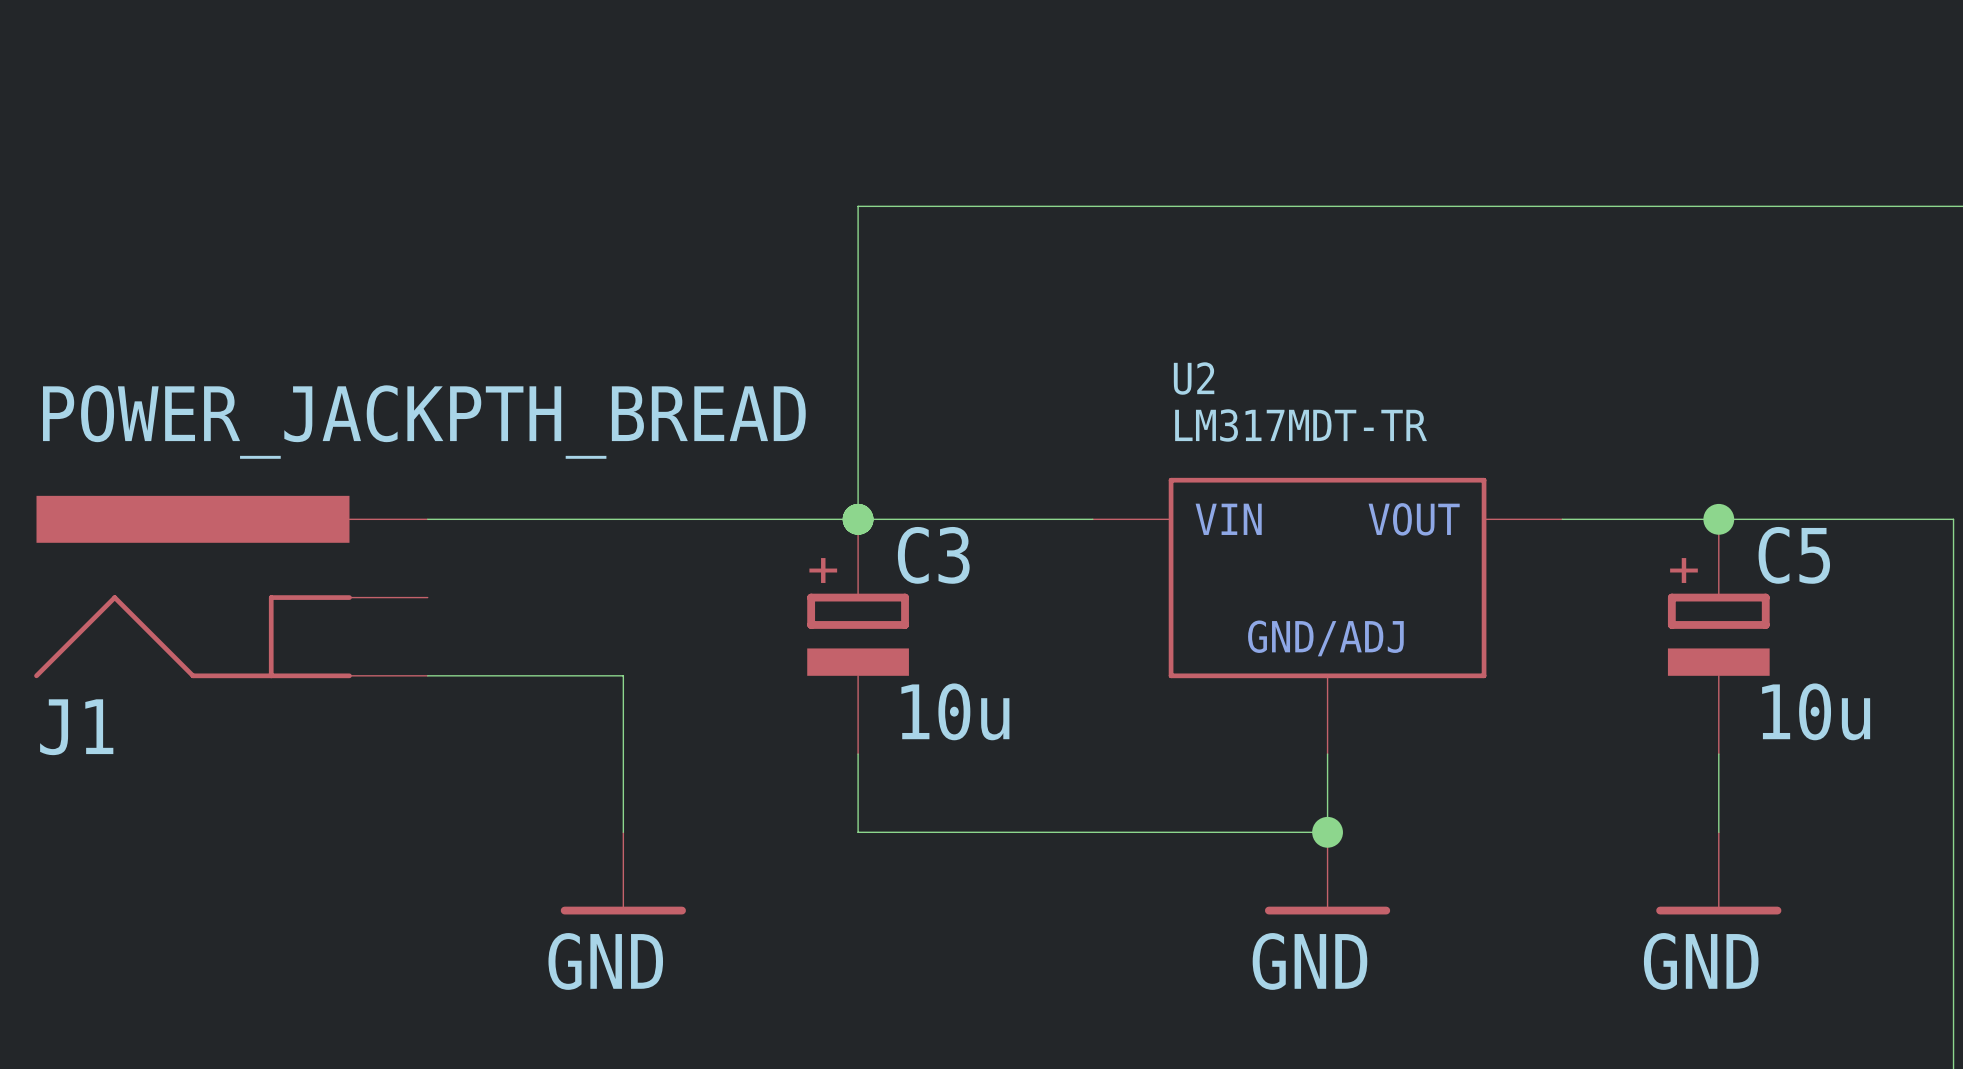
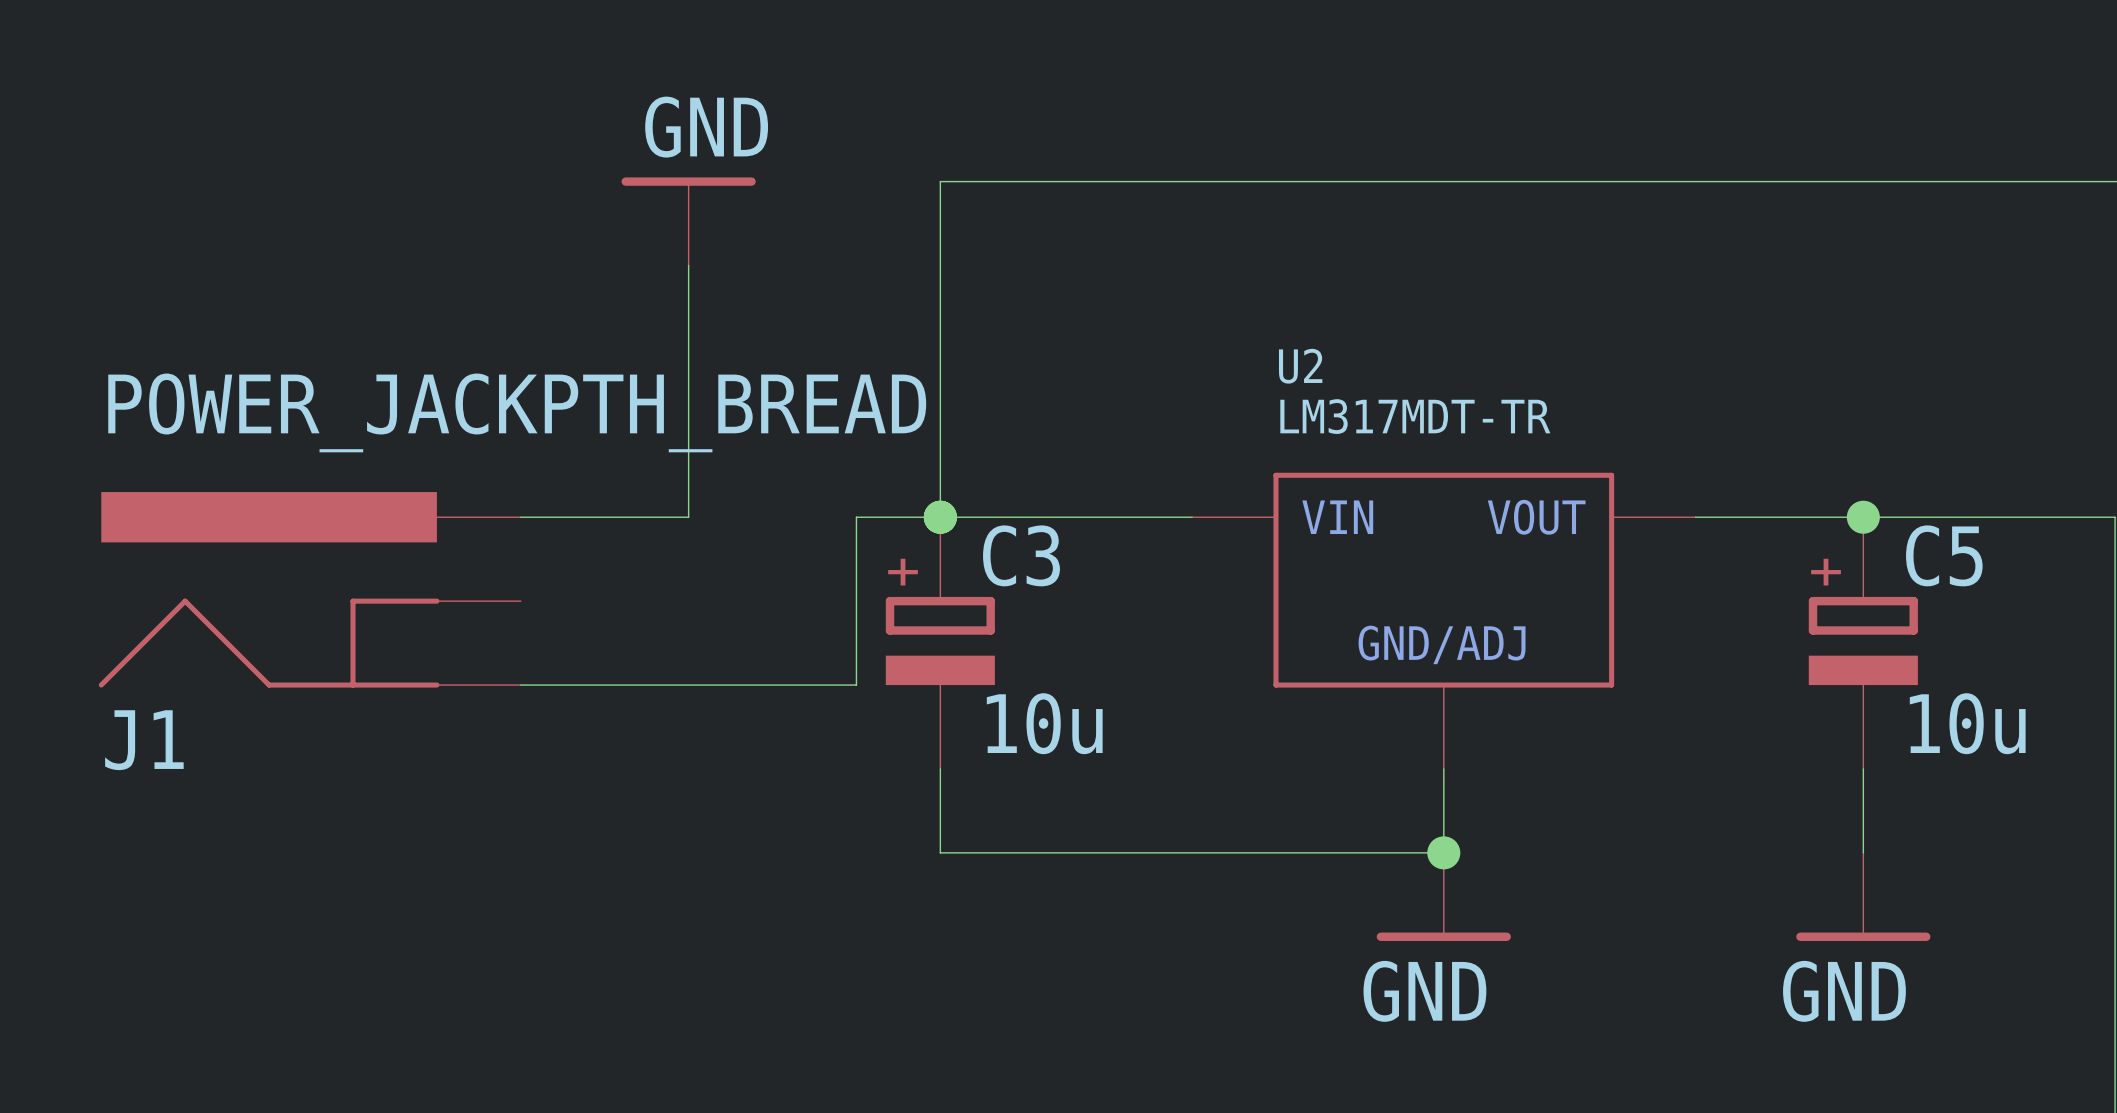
wire: none -> (688, 265) (688, 517)
wire: (623, 519) (779, 519) -> (688, 685) (856, 685) (856, 517)
J1 position: (230, 587) -> (309, 589)
wire: (623, 675) (623, 832) -> none
power symbol position: GND (623, 873) -> GND (688, 221)
power symbol rotation: 0° (623, 910) -> 180° (688, 181)

